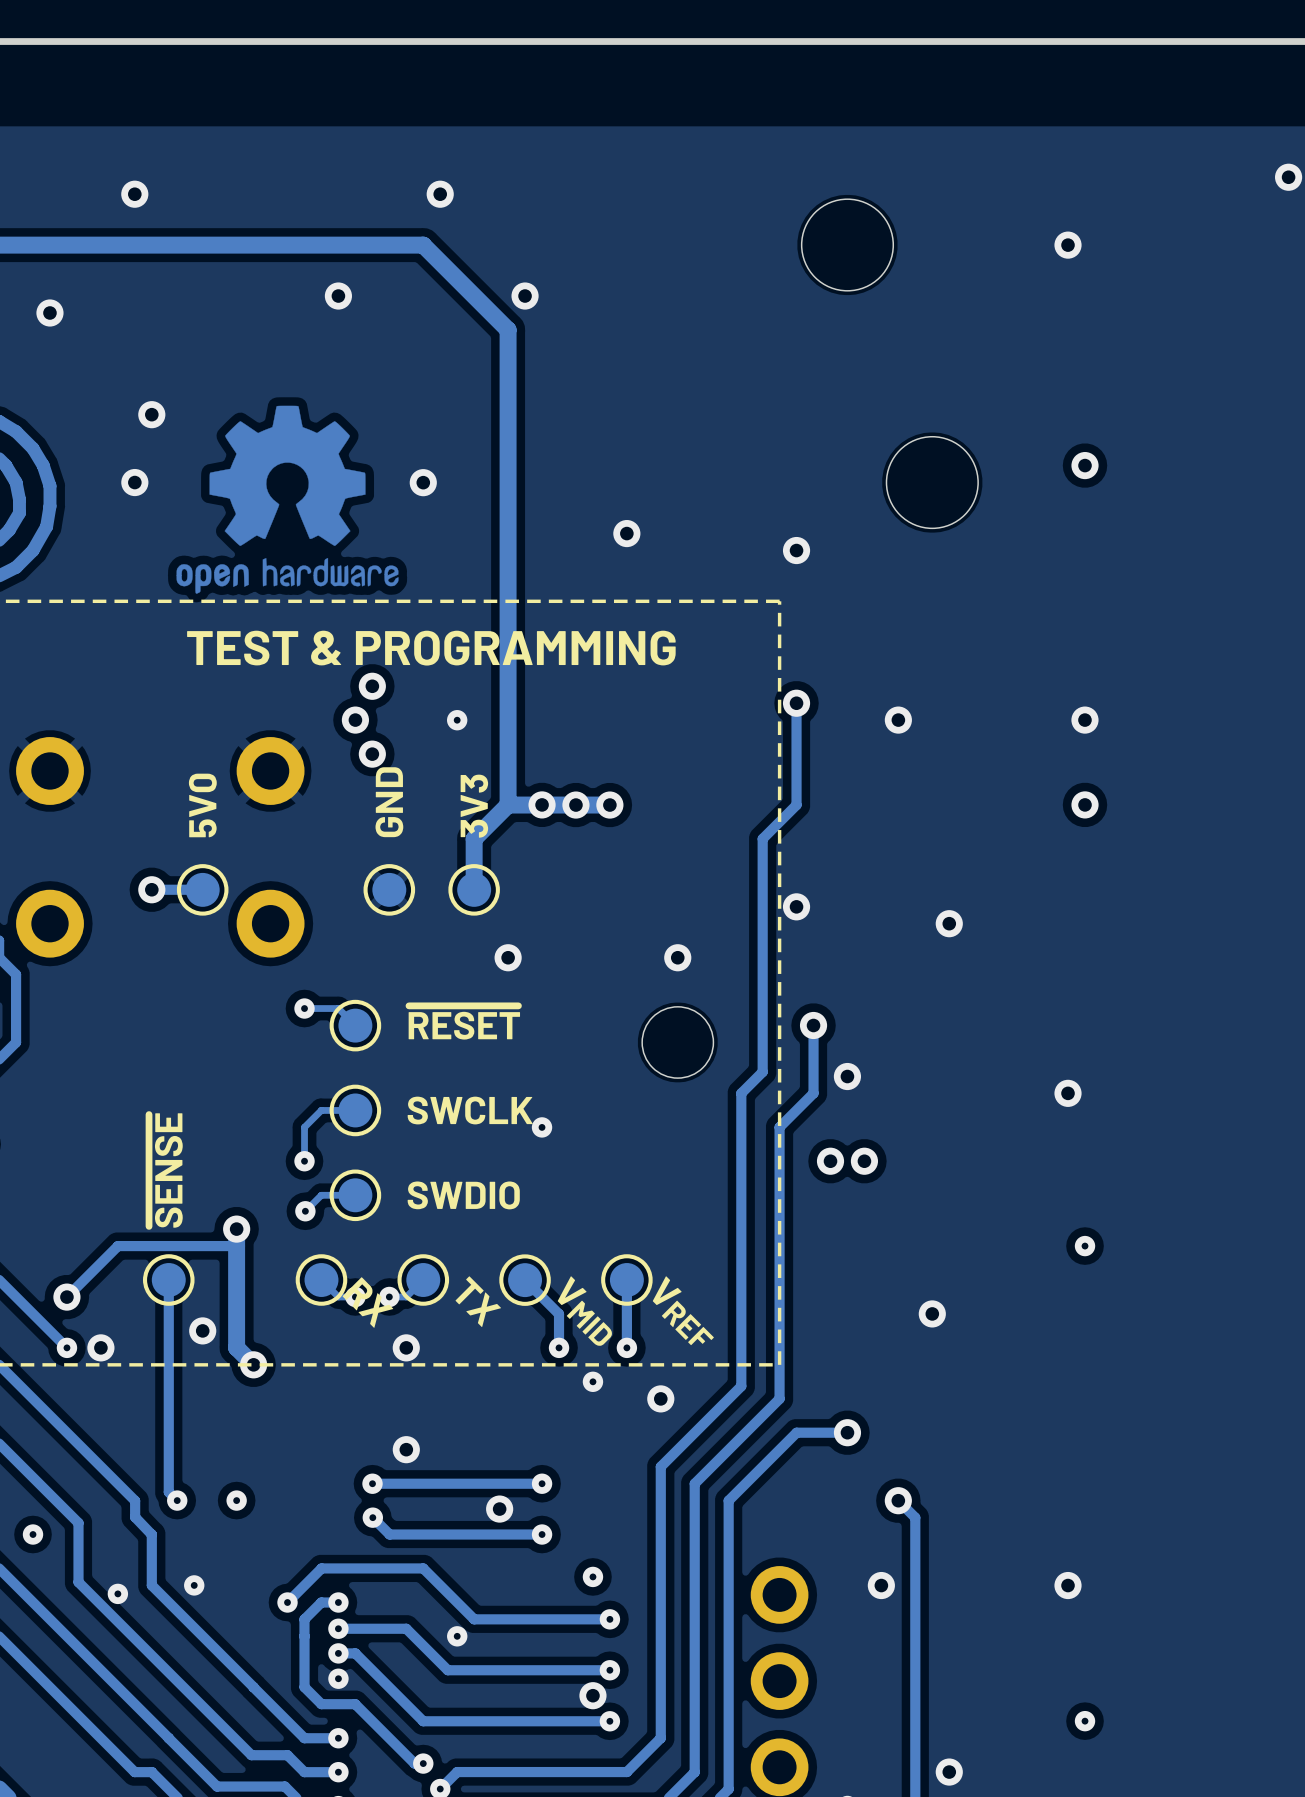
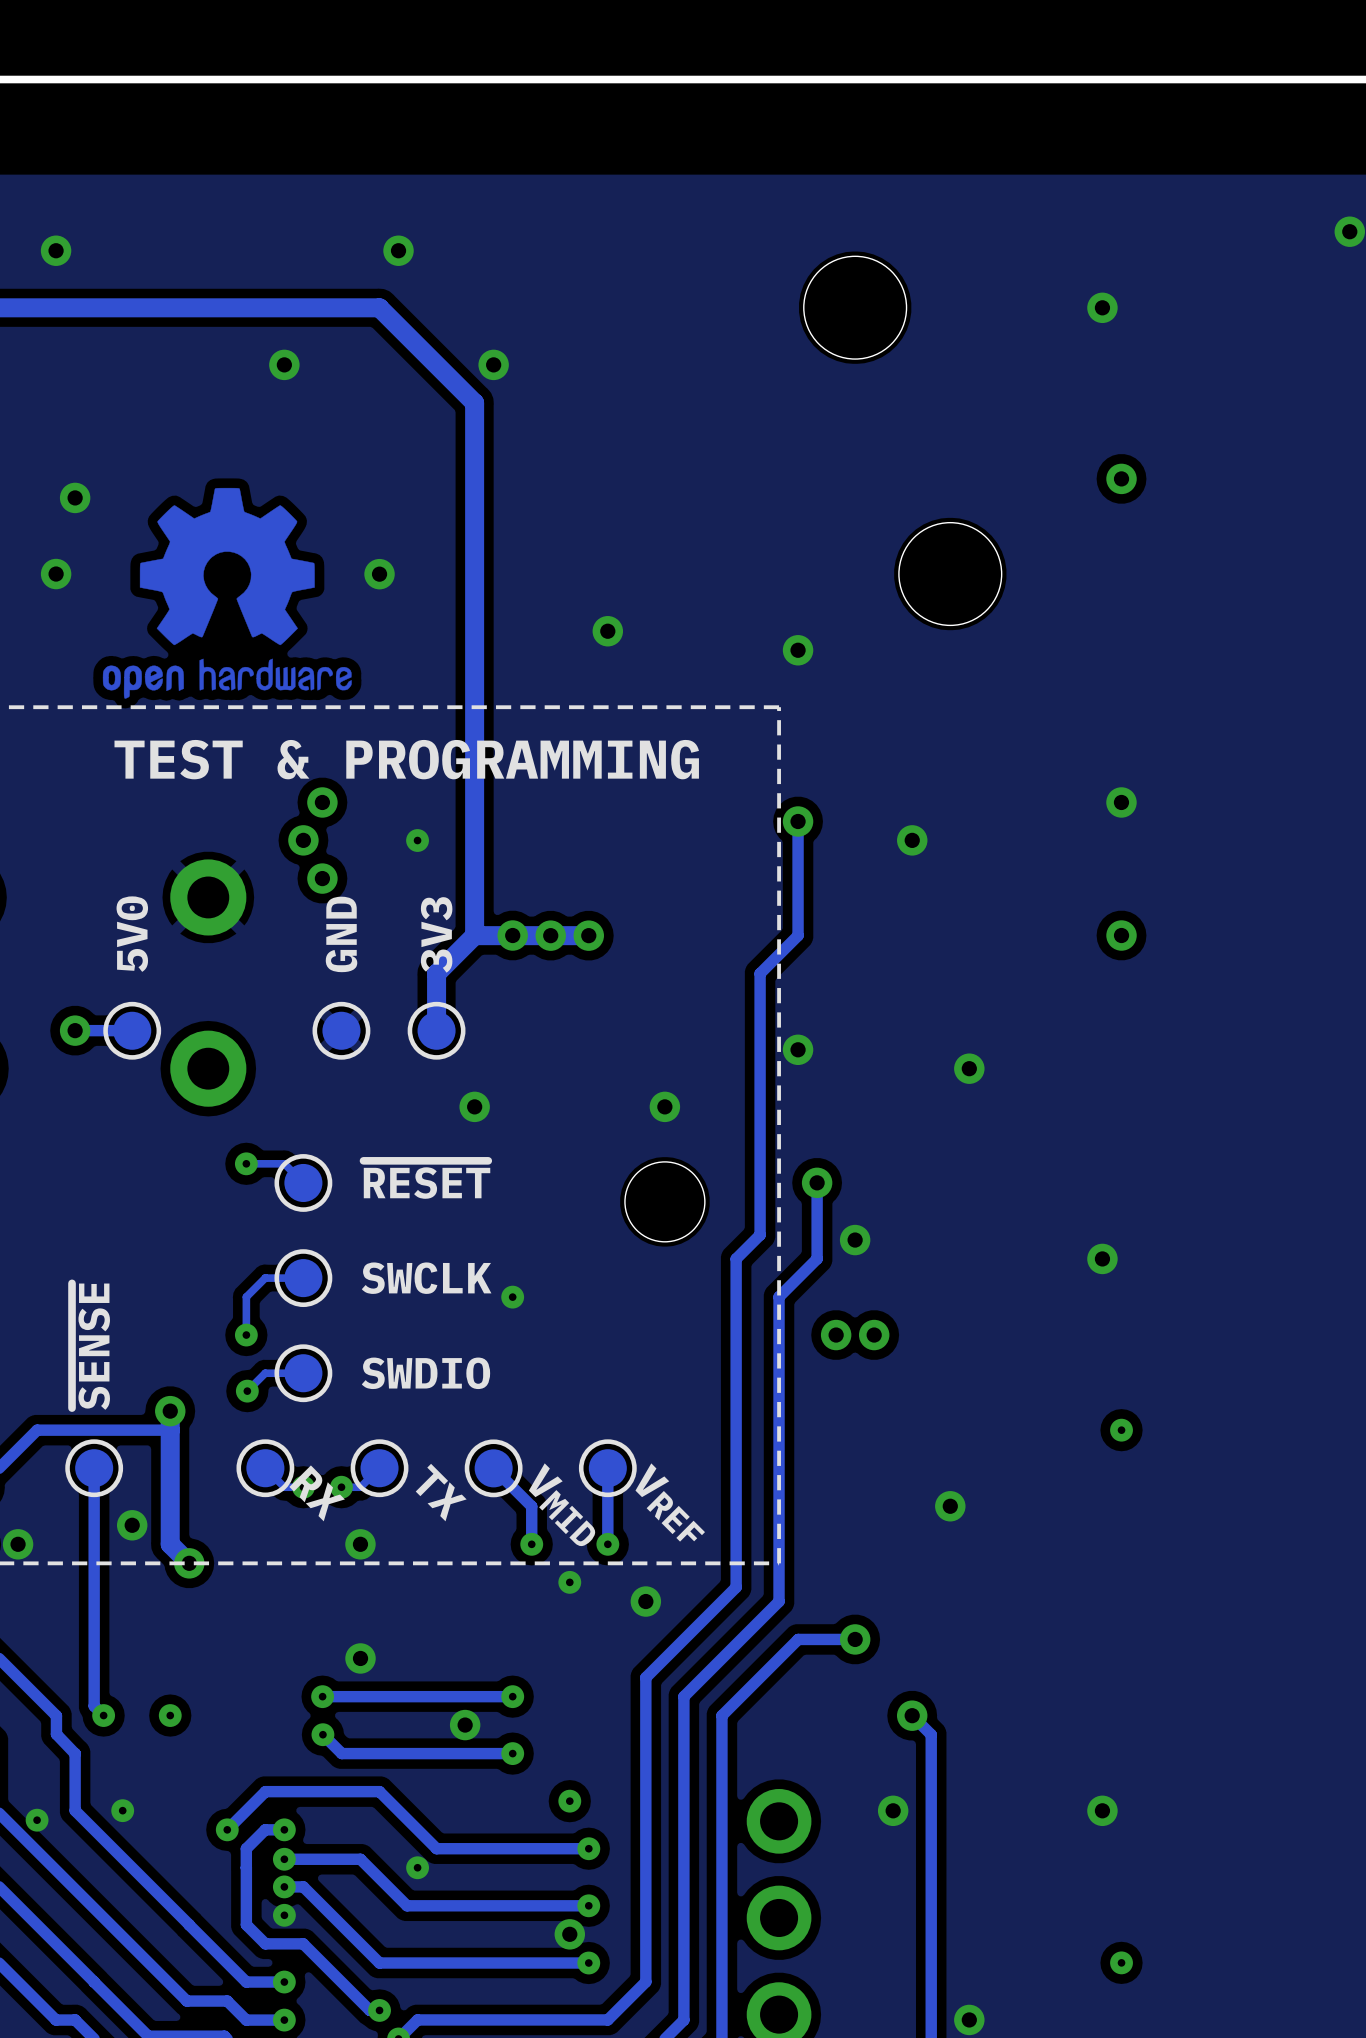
via position: (1085, 465) -> (1121, 478)
via position: (1084, 720) -> (1121, 802)

